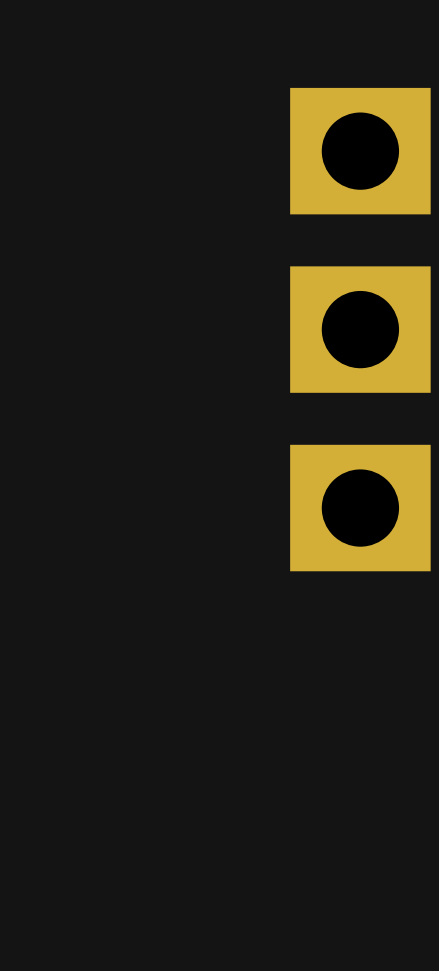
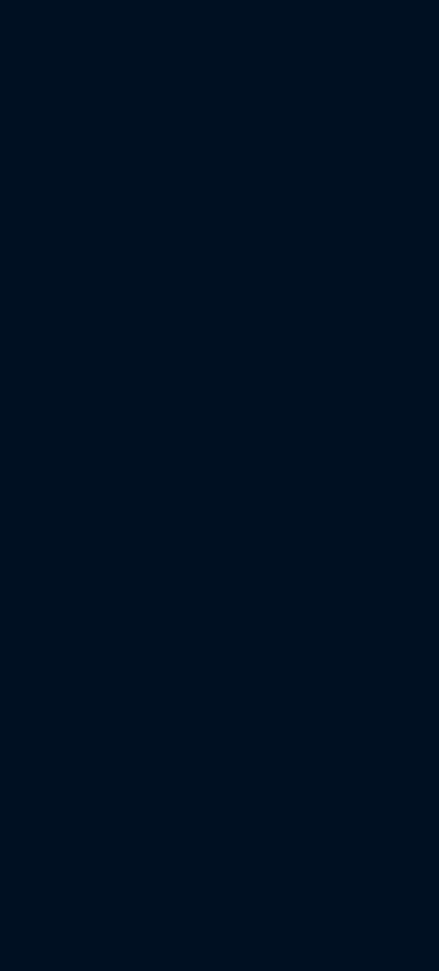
part: (360, 329) -> none

